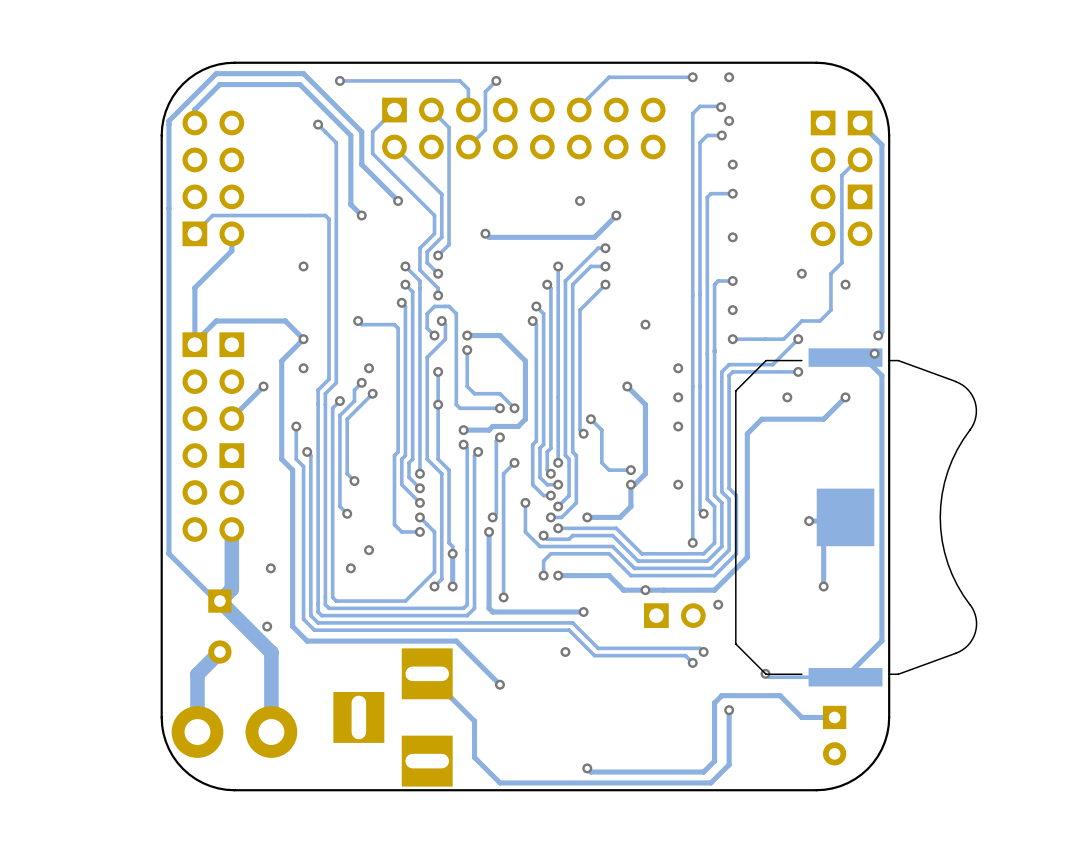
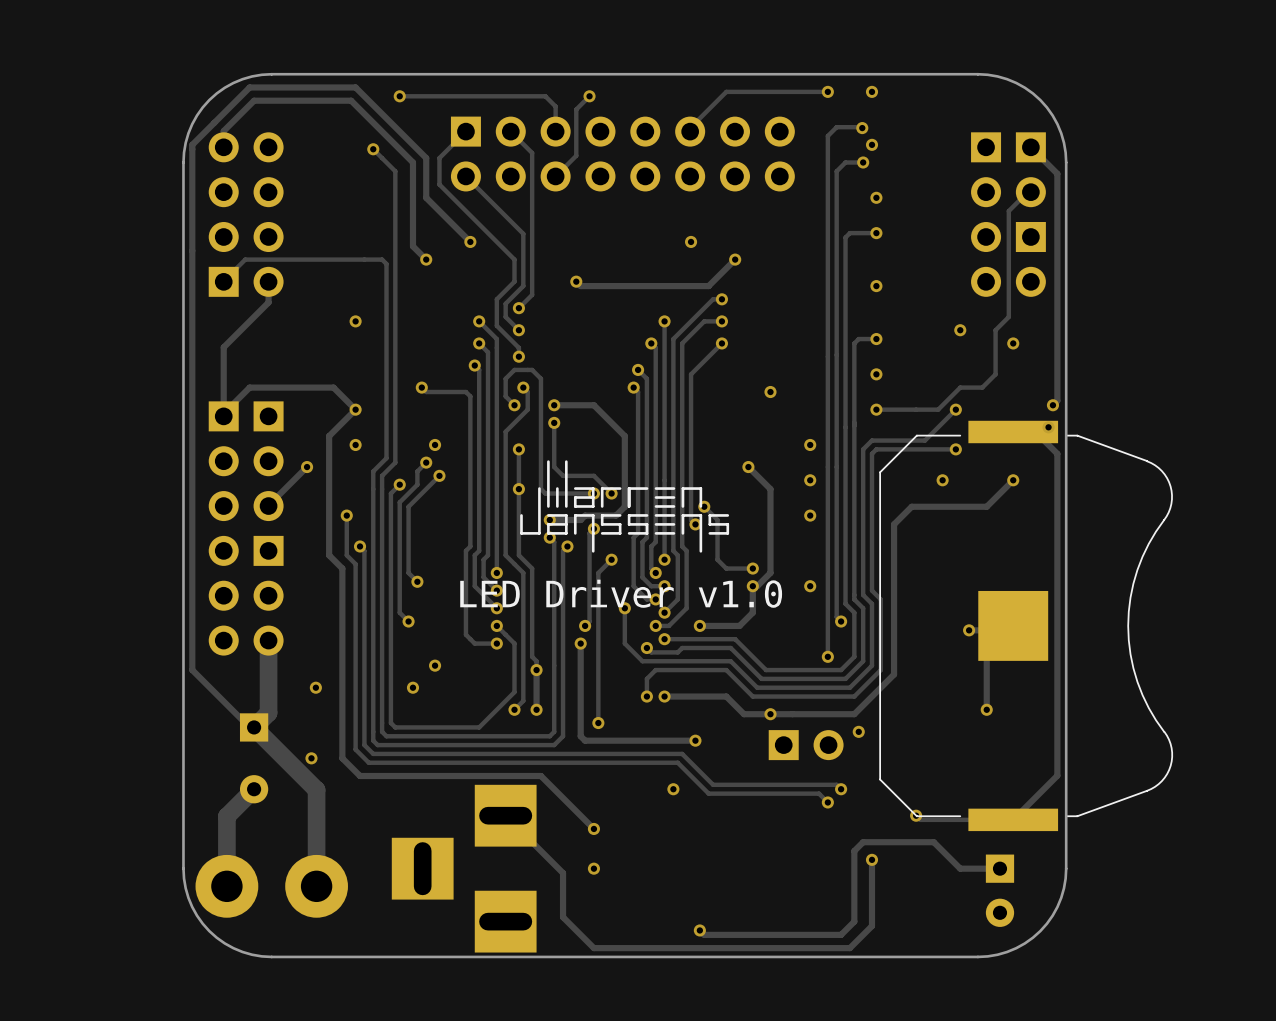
drawing: none -> [520, 460, 730, 553]
text: none -> LED Driver v1.0 (621, 593)
via: none -> (593, 868)

